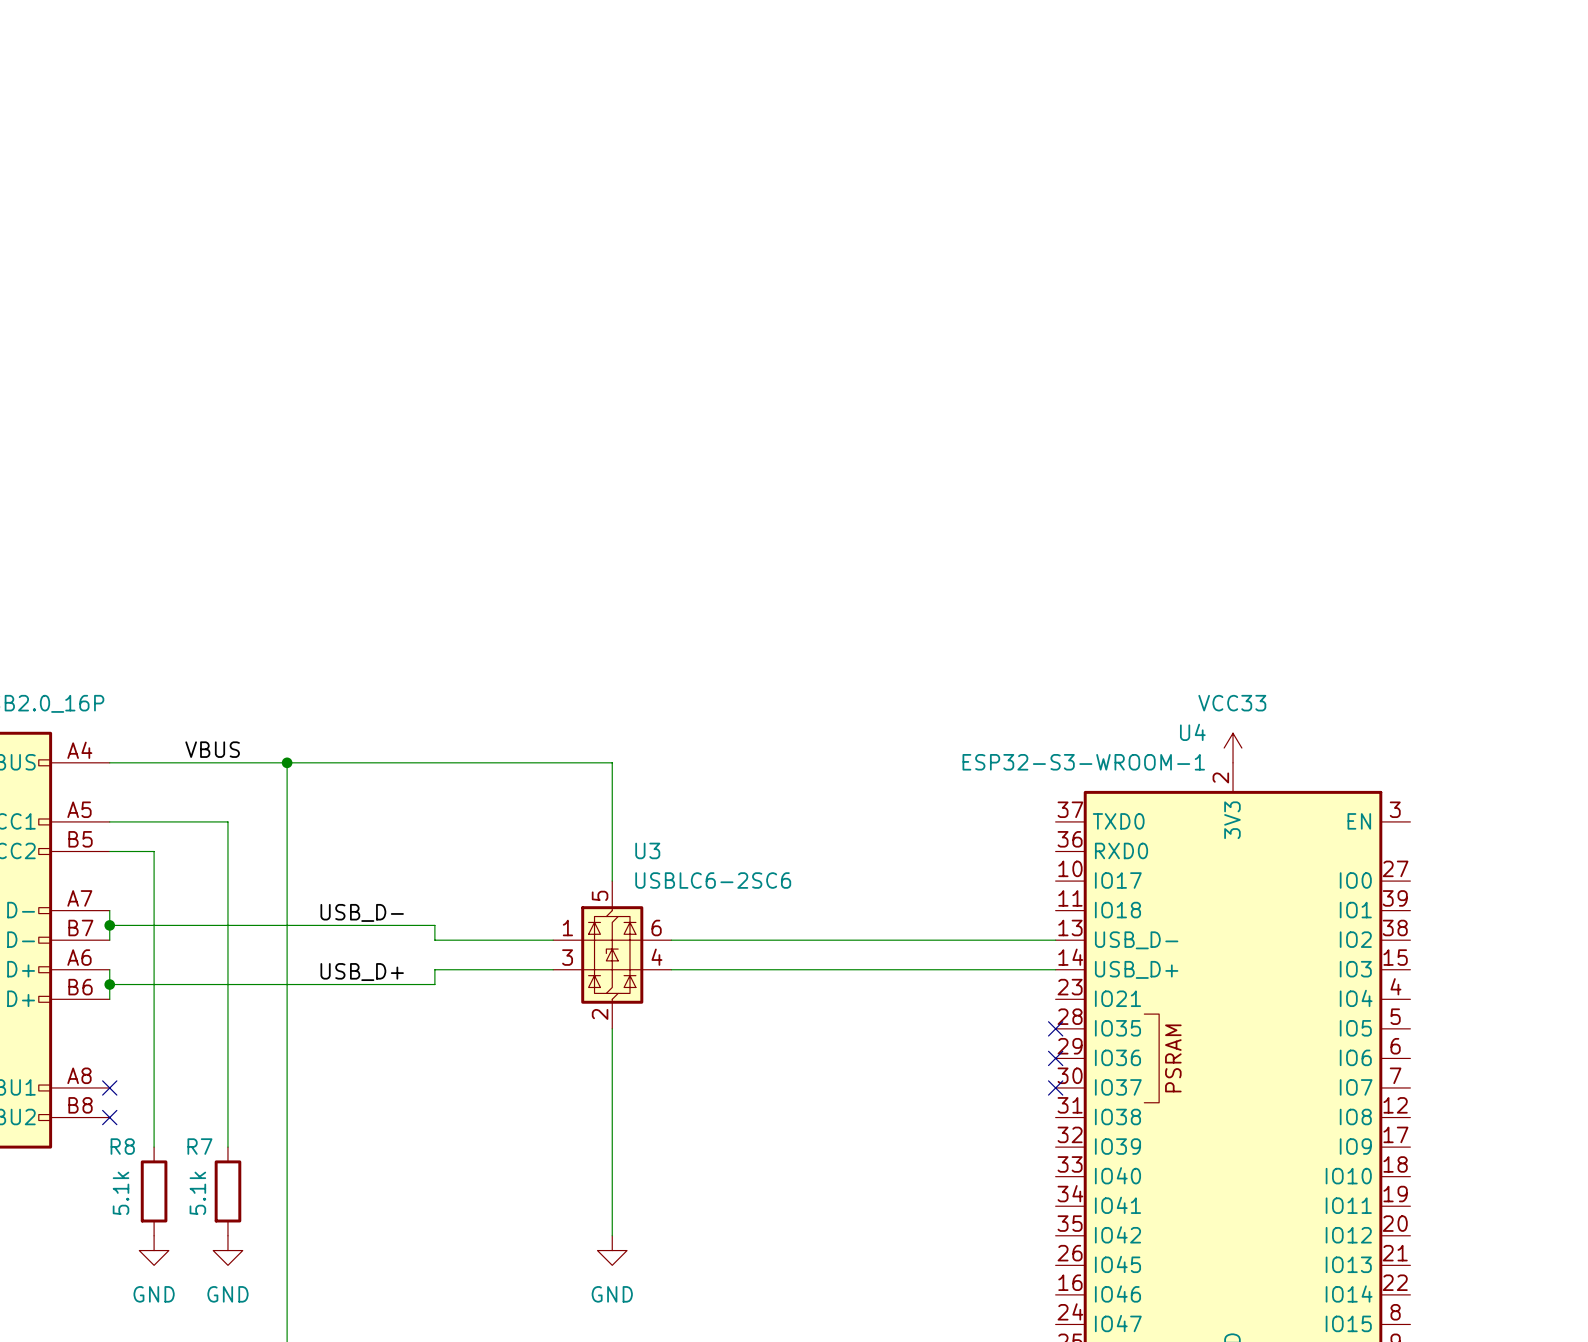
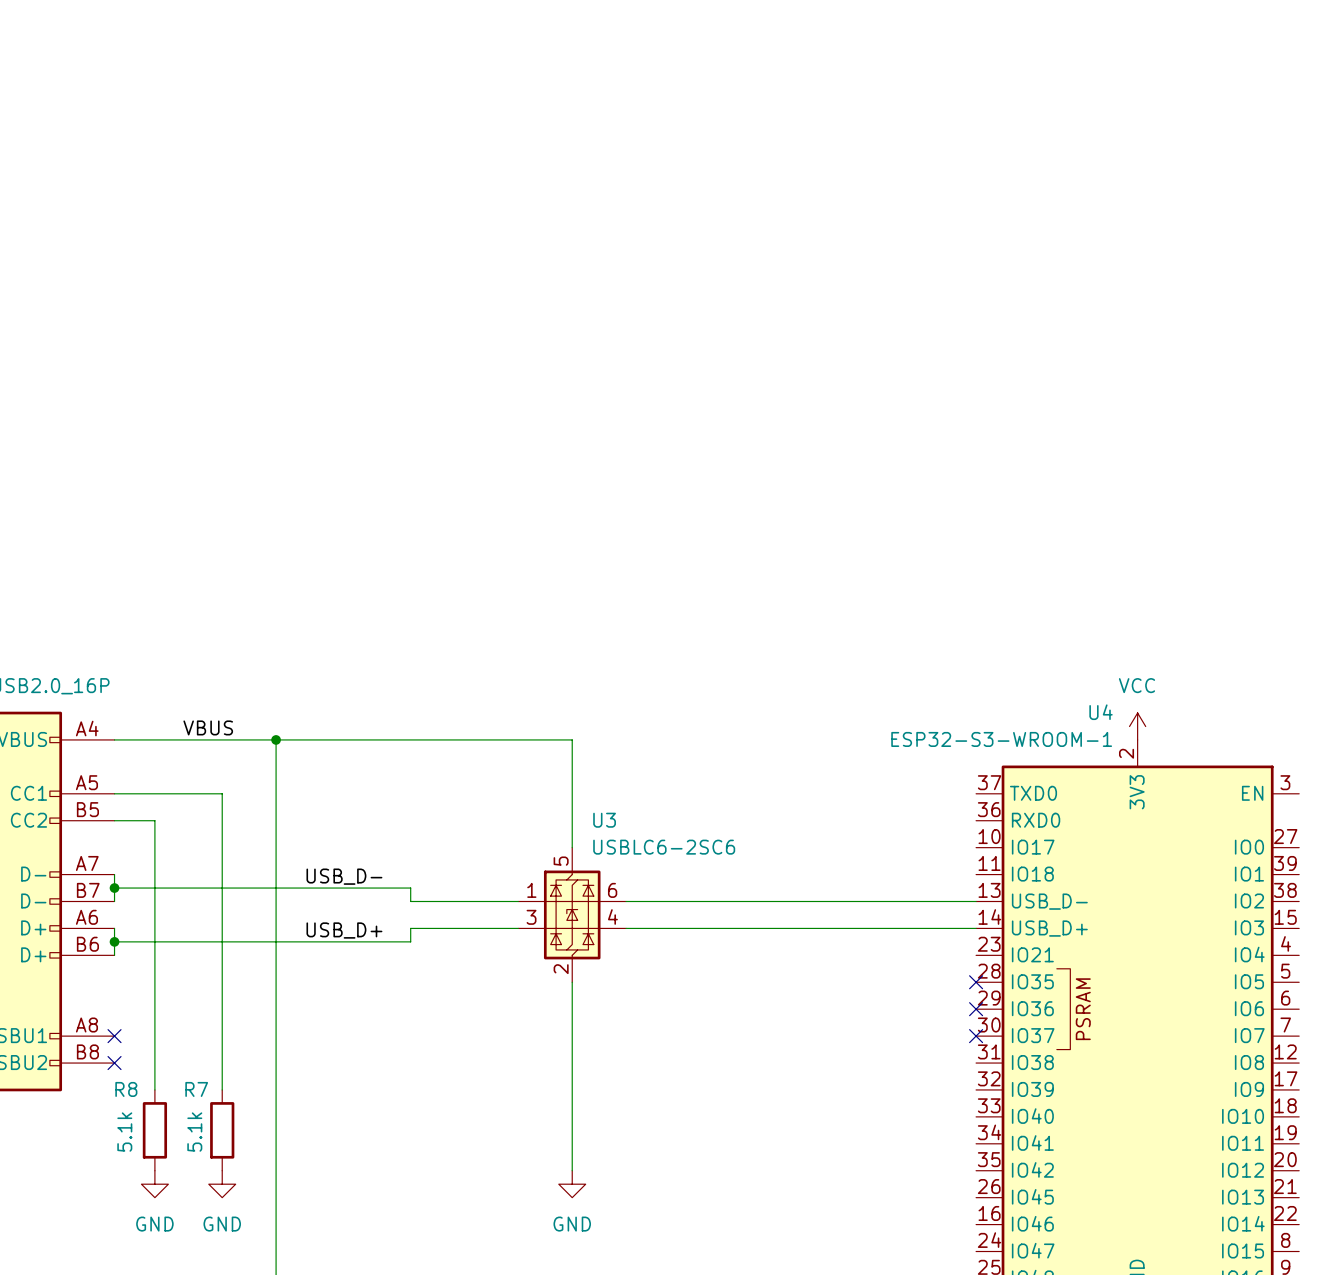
power symbol: VCC33 (1233, 748) -> VCC (1137, 726)

